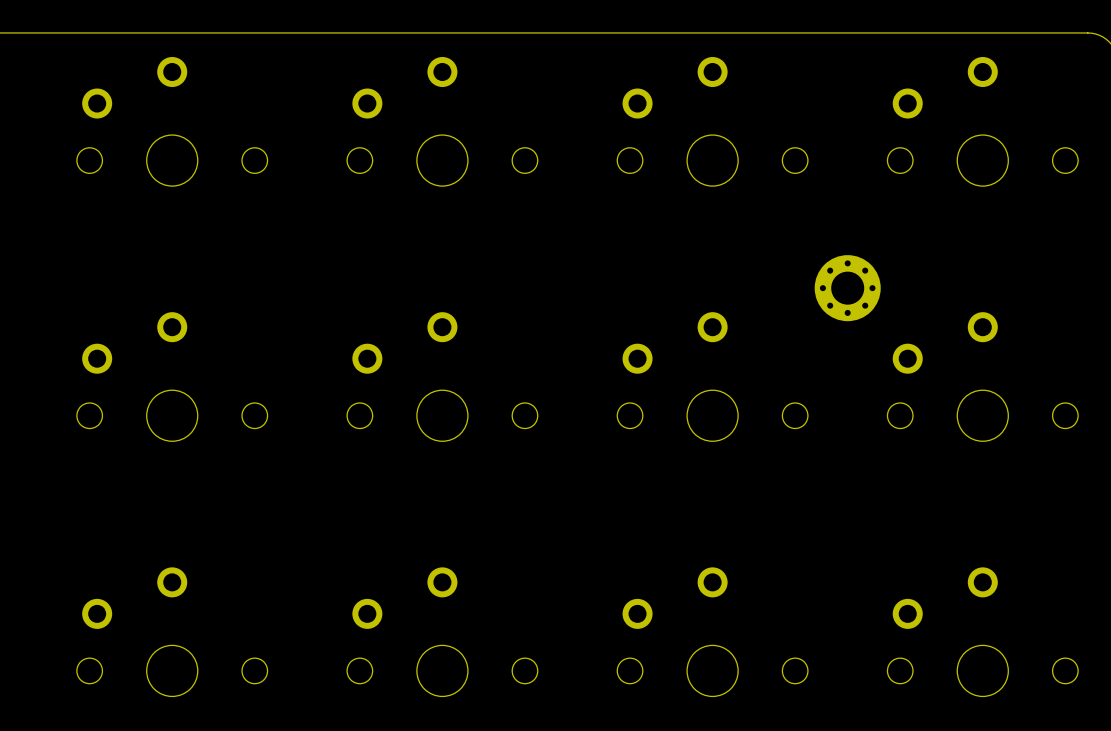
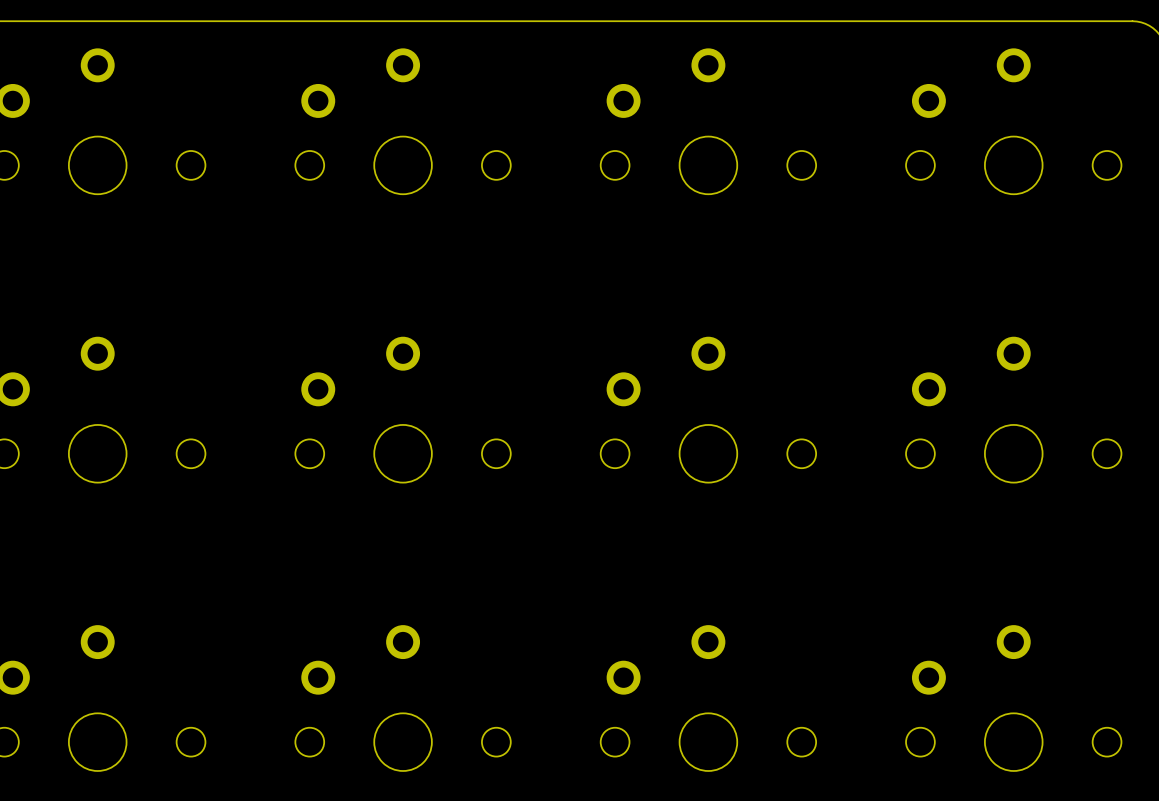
part: (847, 288) -> none

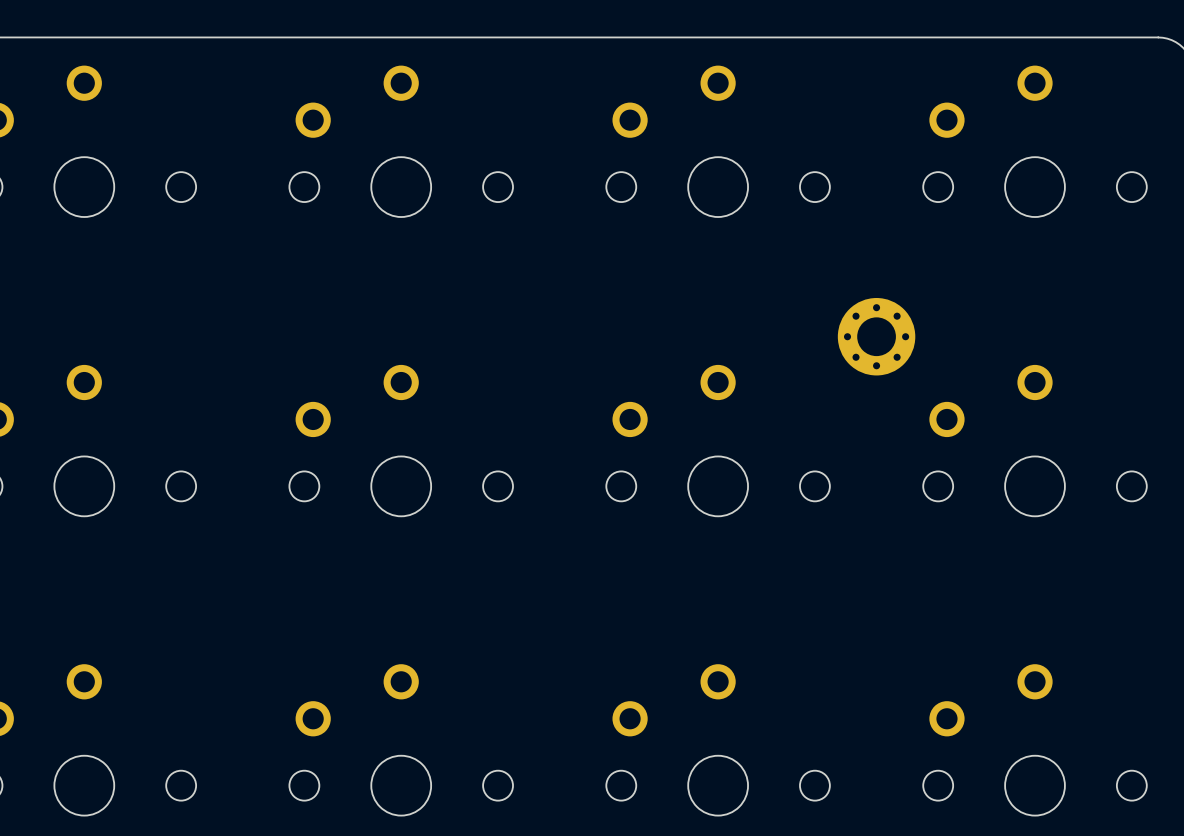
part: none -> (876, 336)

